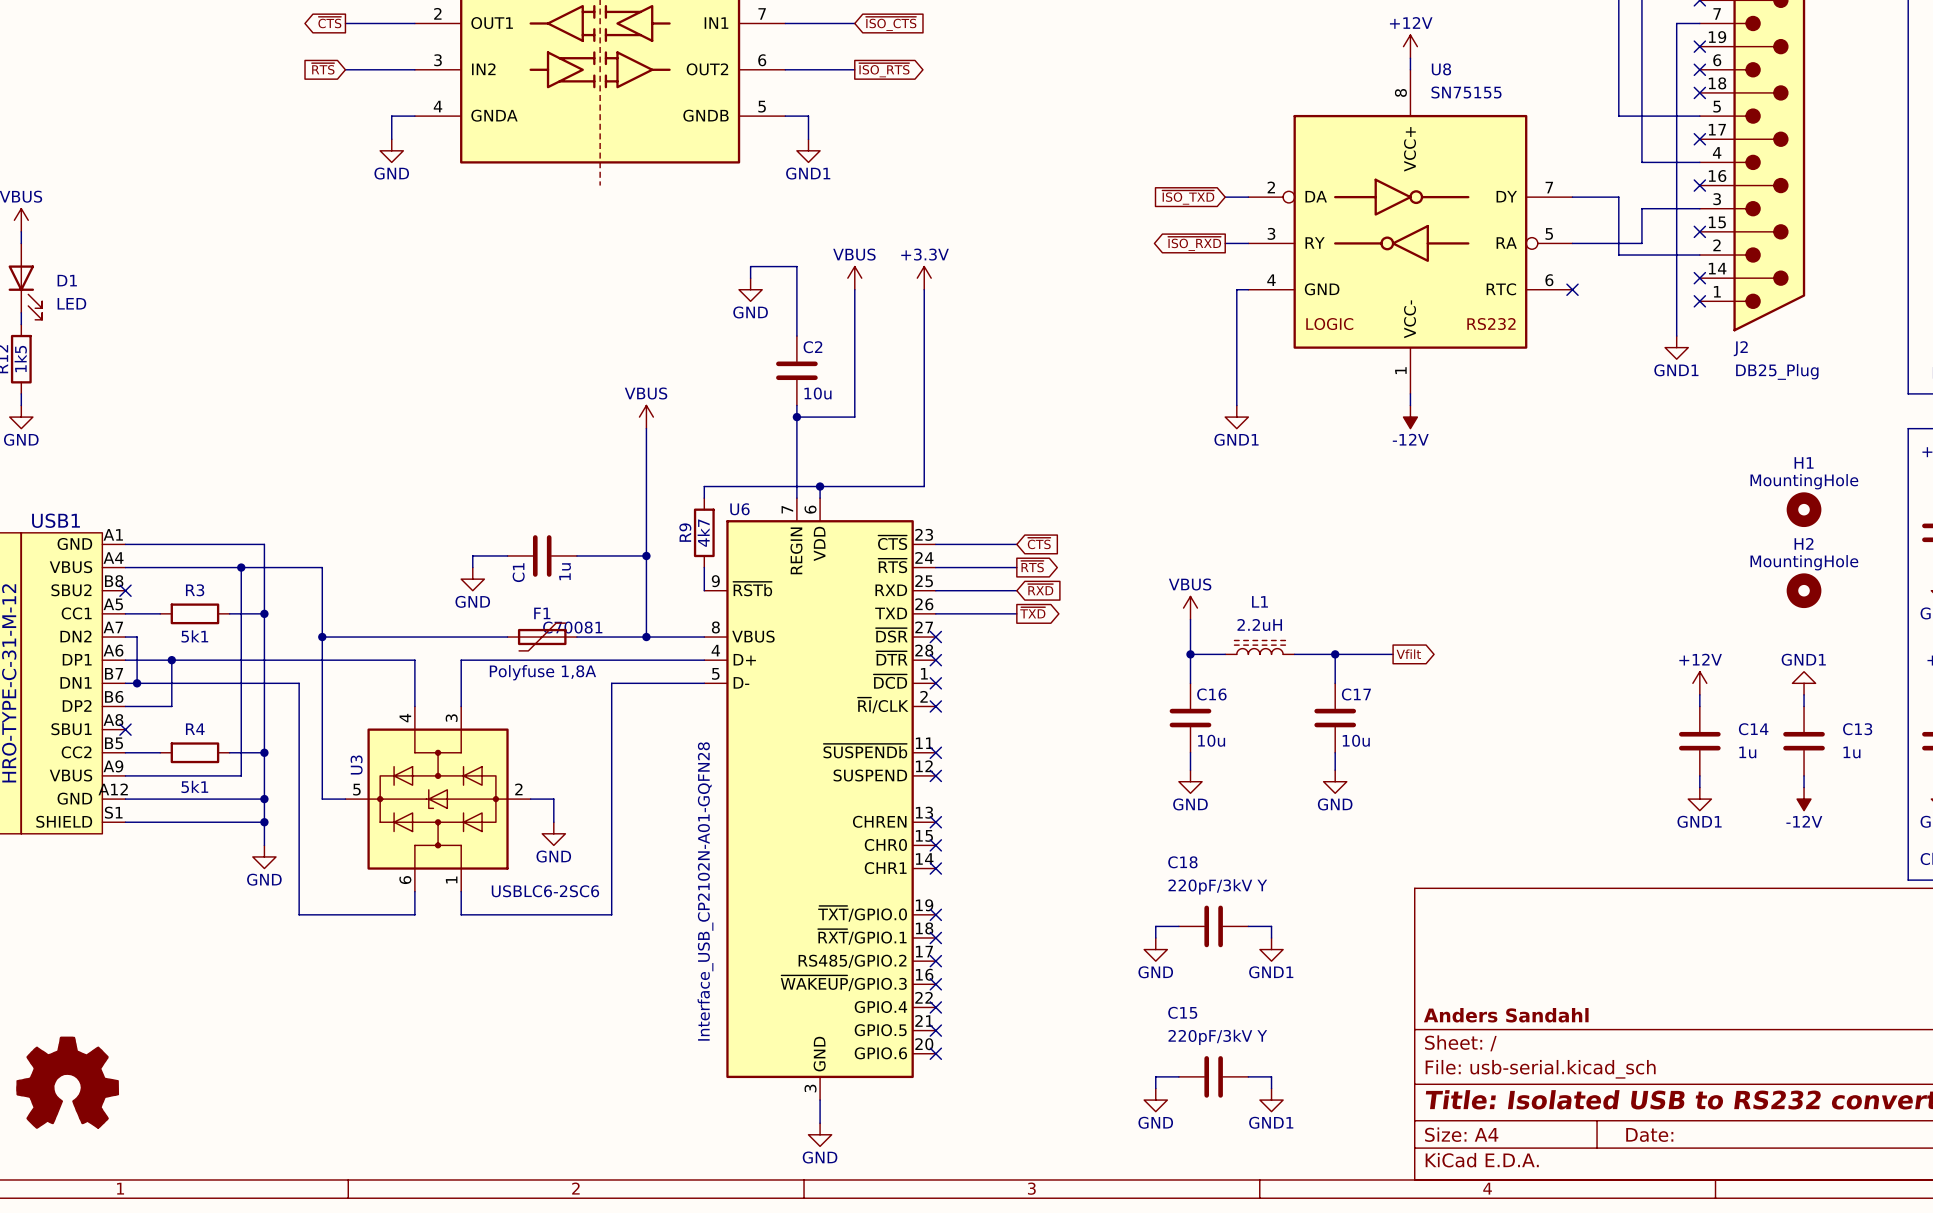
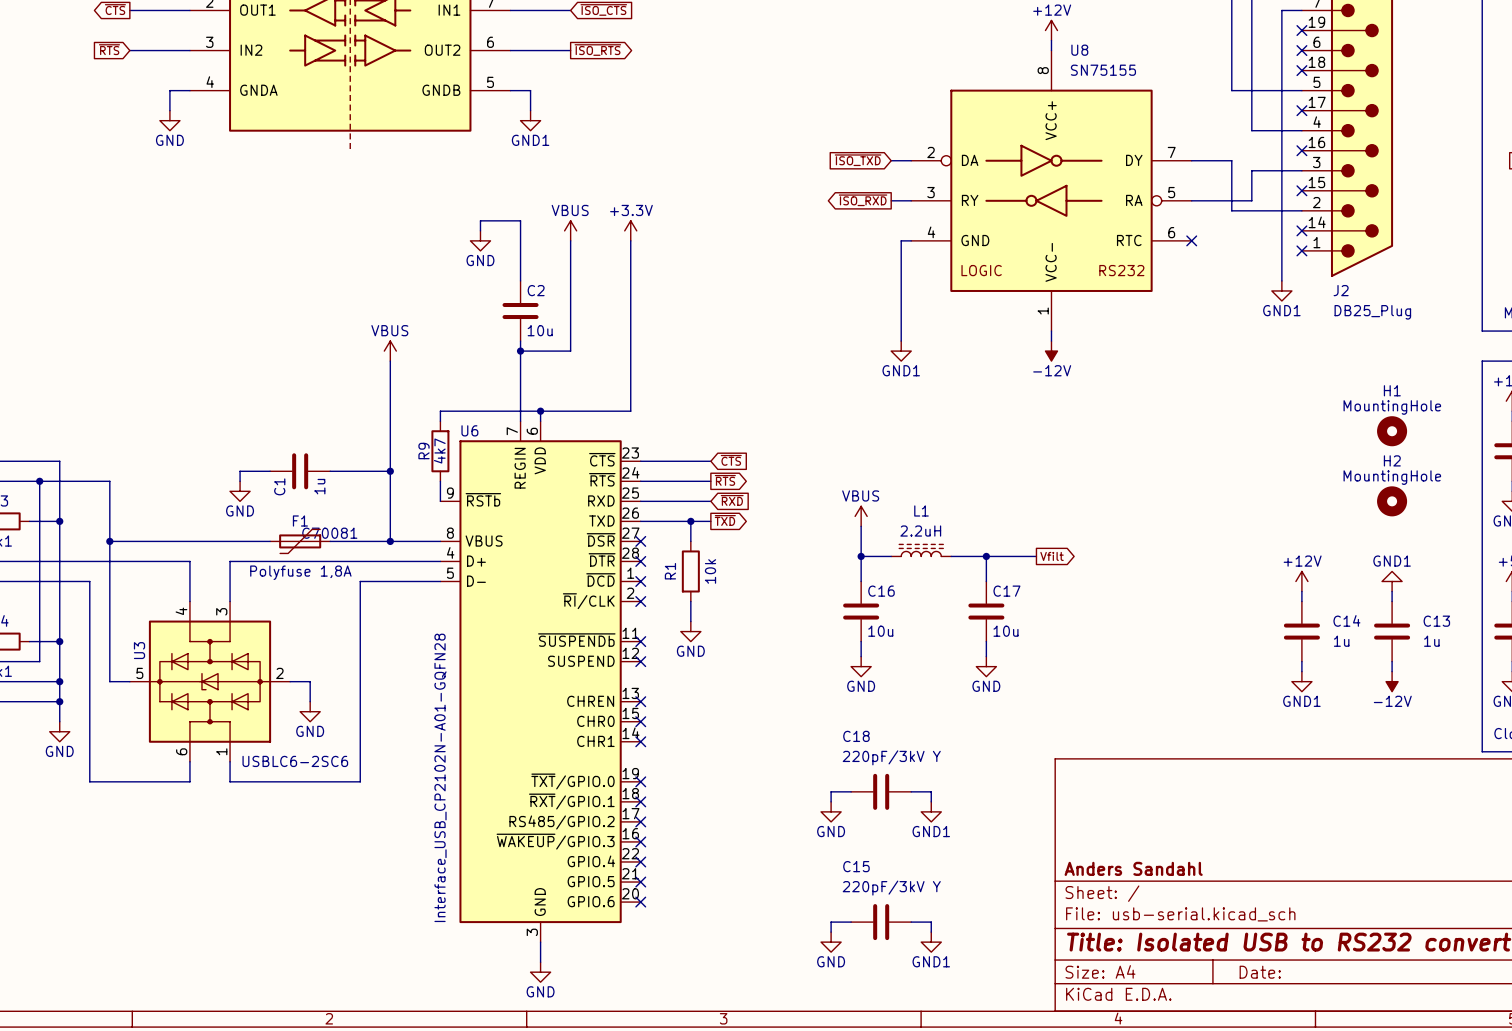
wire: none -> (690, 521) (690, 541)
junction: none -> (690, 521)
R1: none -> 10k (690, 571)
wire: none -> (690, 601) (690, 621)
power symbol: none -> GND (690, 631)

